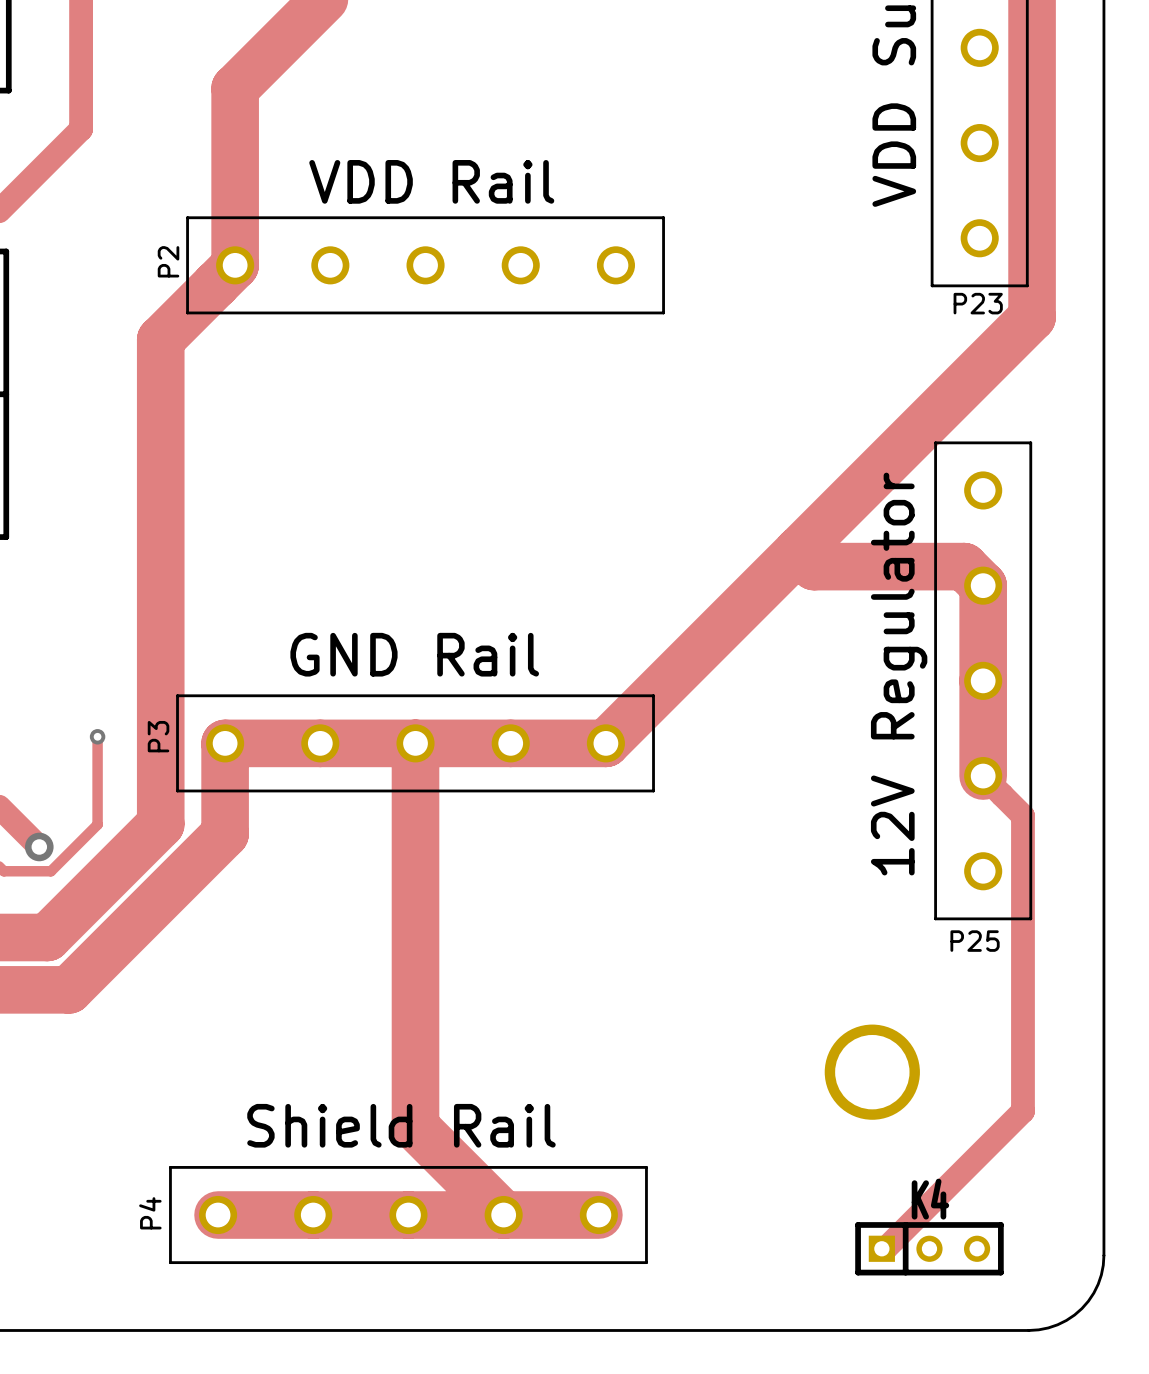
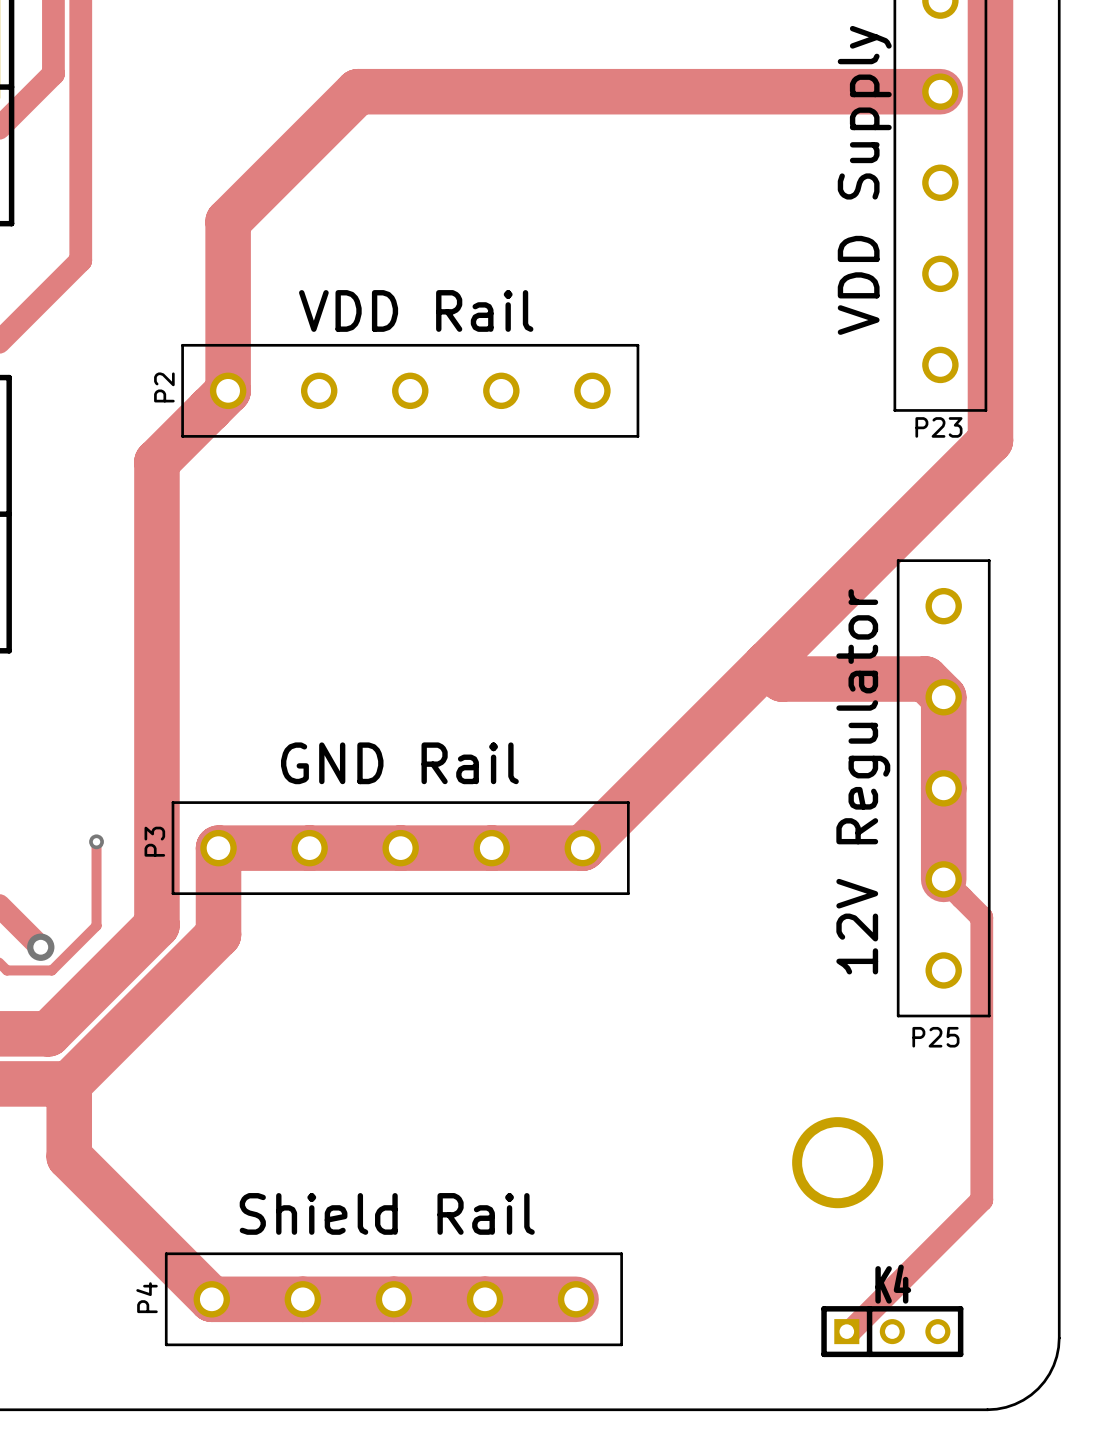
track: (415, 743) (415, 1126) (503, 1215) -> none
track: none -> (69, 1083) (69, 1156) (211, 1299)

